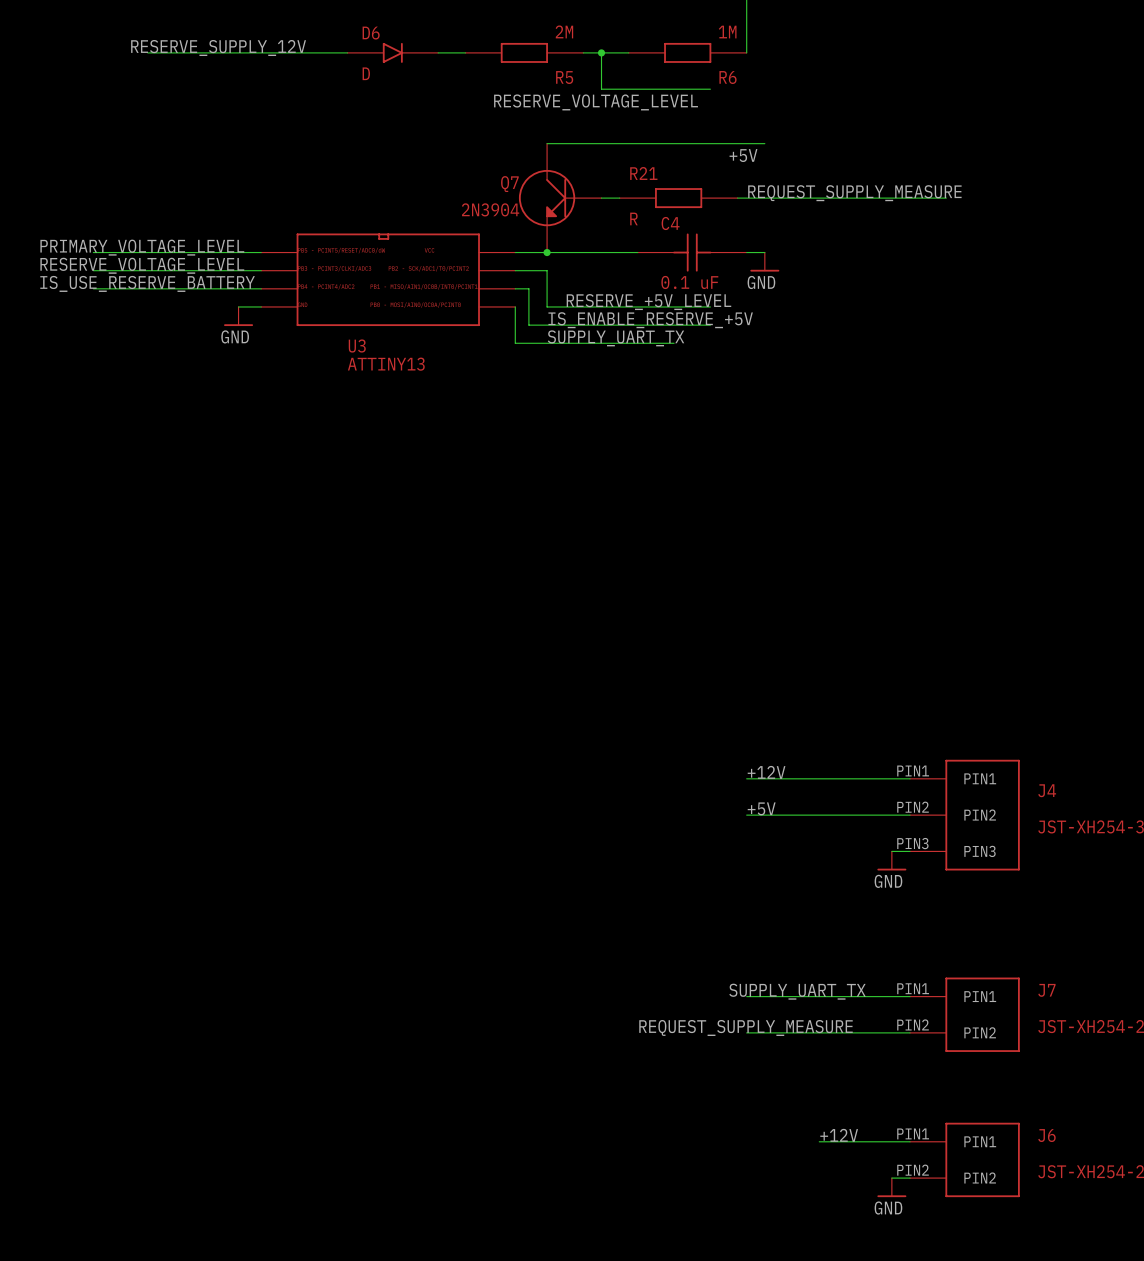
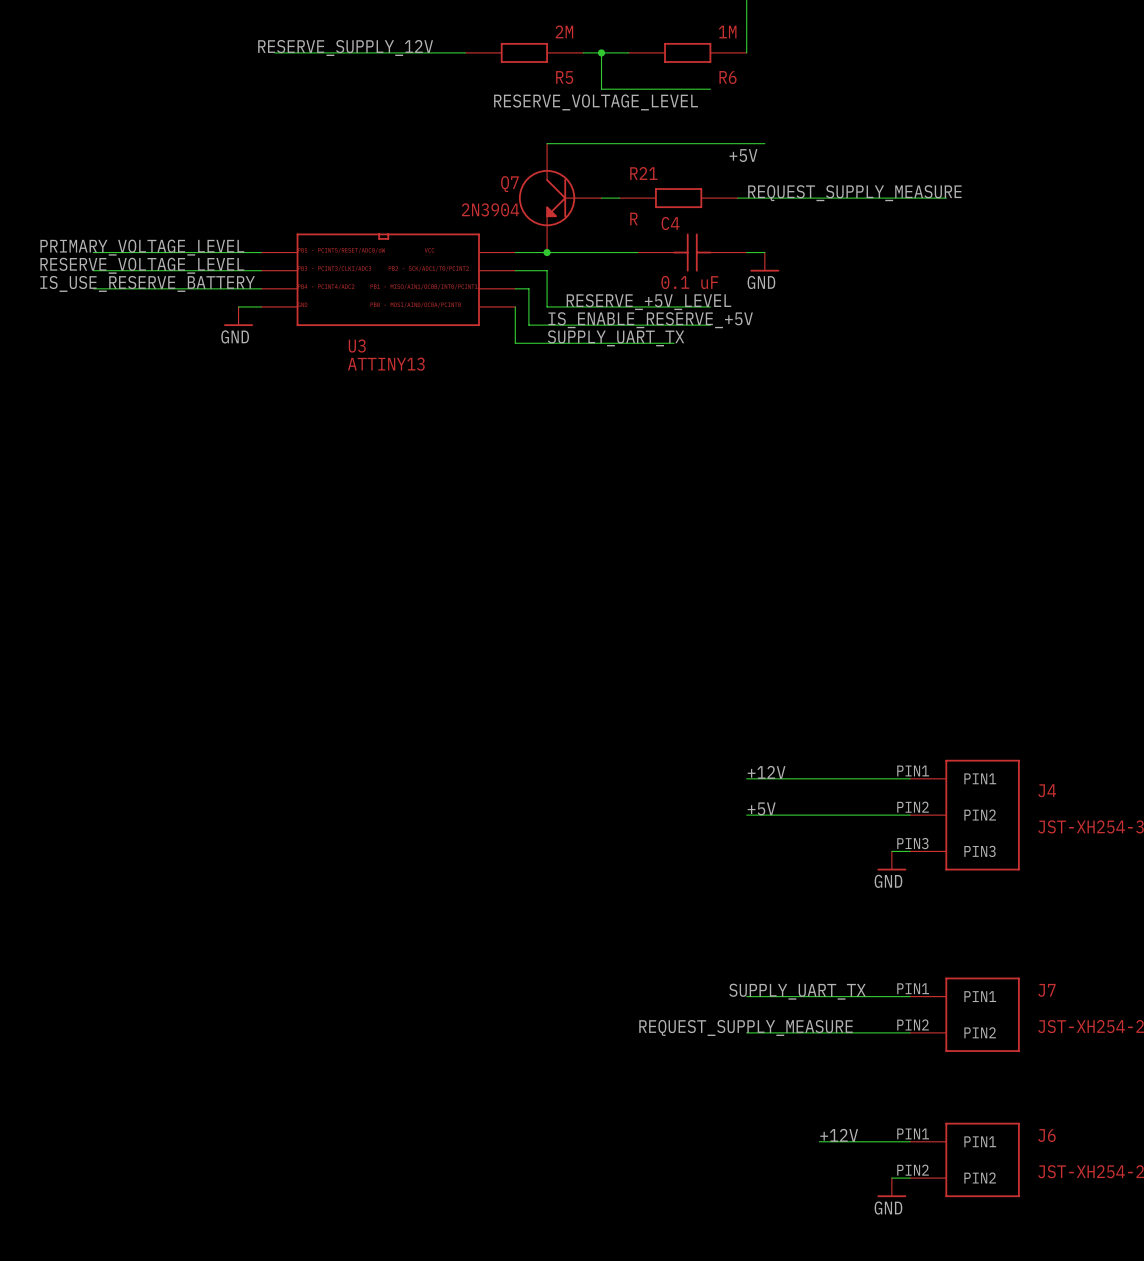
label position: RESERVE_SUPPLY_12V (218, 47) -> RESERVE_SUPPLY_12V (345, 47)
wire: (147, 52) (274, 52) -> none
D6: D (392, 52) -> none

